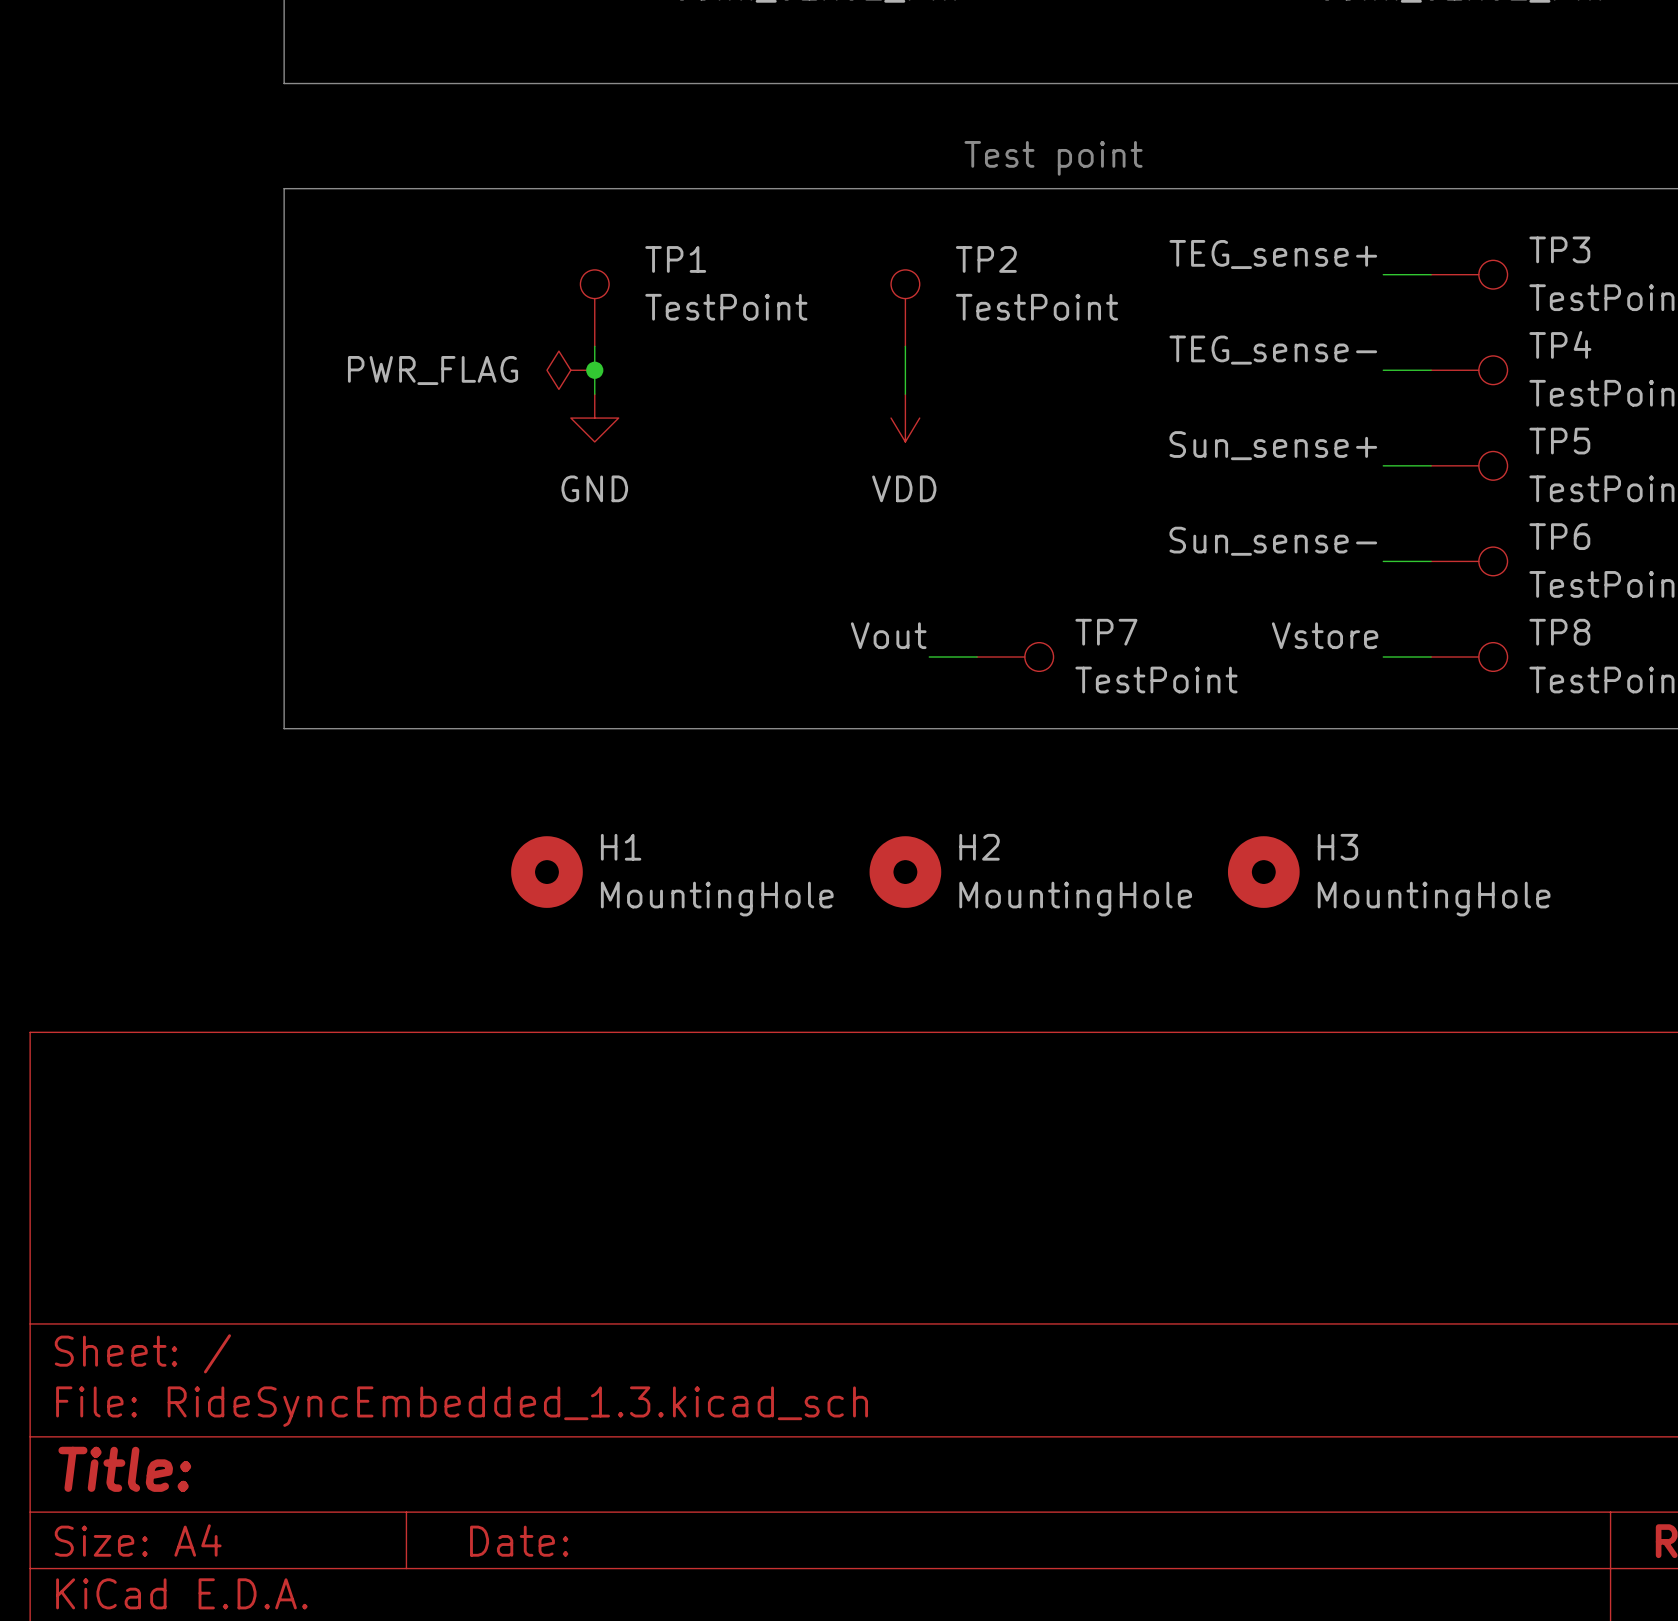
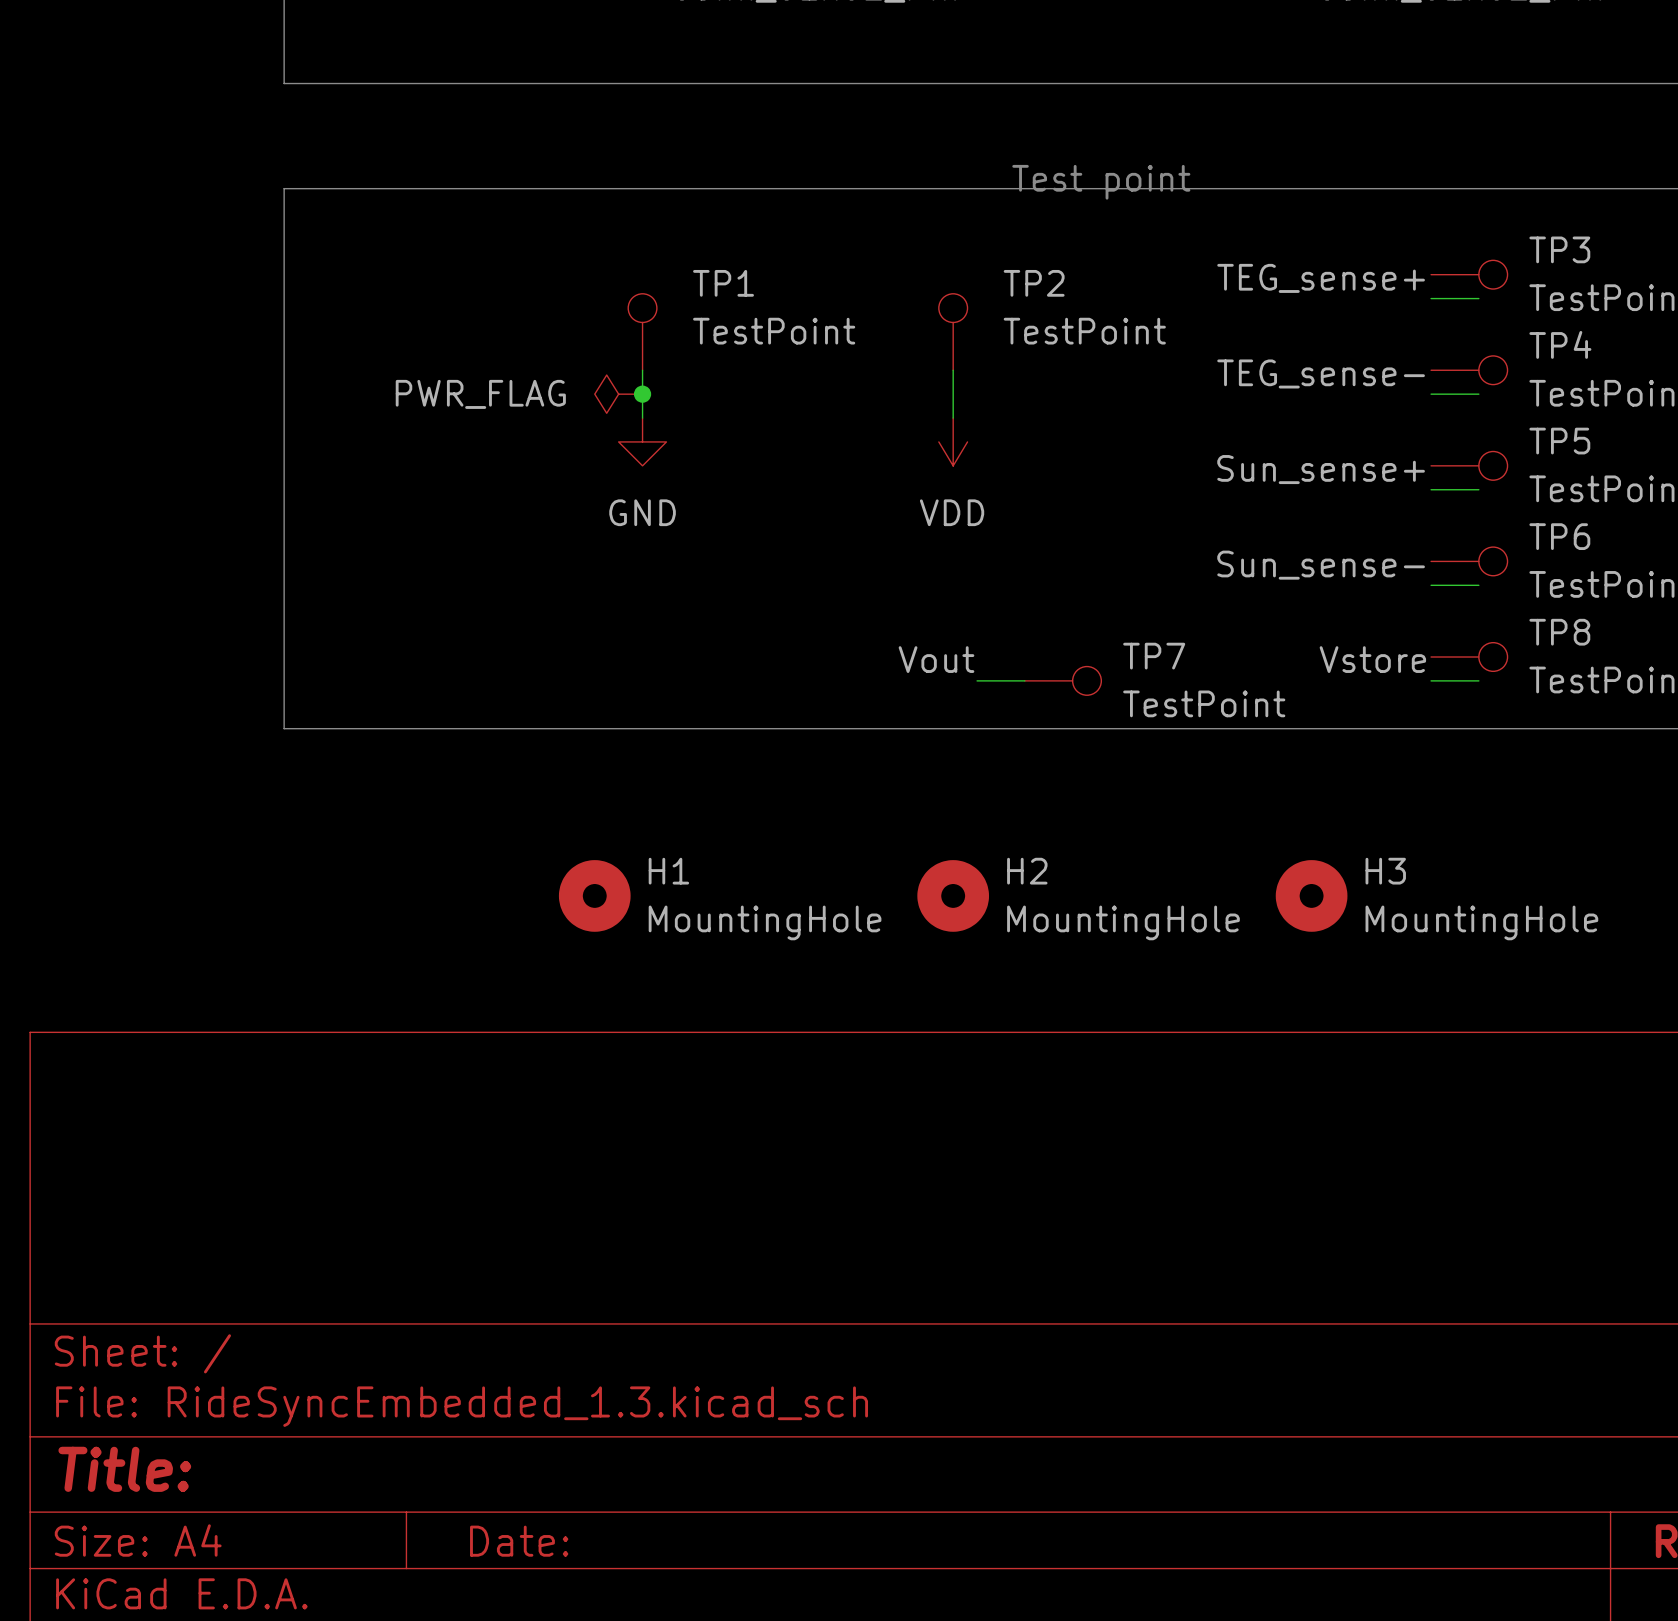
text position: Test point (1053, 158) -> Test point (1101, 182)
label position: TEG_sense+ (1273, 254) -> TEG_sense+ (1321, 278)
wire: (1383, 274) (1431, 274) -> (1431, 298) (1478, 298)
TP1 position: (594, 308) -> (642, 332)
TP2 position: (905, 308) -> (953, 332)
wire: (594, 346) (594, 394) -> (642, 370) (642, 418)
wire: (905, 346) (905, 394) -> (953, 370) (953, 418)
label position: TEG_sense- (1273, 350) -> TEG_sense- (1321, 373)
power symbol position: PWR_FLAG (570, 370) -> PWR_FLAG (618, 394)
junction position: (594, 370) -> (642, 394)
wire: (1383, 370) (1431, 370) -> (1431, 394) (1478, 394)
power symbol position: GND (594, 418) -> GND (642, 441)
power symbol position: VDD (905, 418) -> VDD (953, 441)
label position: Sun_sense+ (1273, 445) -> Sun_sense+ (1321, 469)
wire: (1383, 465) (1431, 465) -> (1431, 489) (1478, 489)
label position: Sun_sense- (1273, 541) -> Sun_sense- (1321, 565)
wire: (1383, 561) (1431, 561) -> (1431, 585) (1478, 585)
label position: Vout (888, 635) -> Vout (936, 659)
label position: Vstore (1325, 635) -> Vstore (1372, 659)
wire: (929, 657) (977, 657) -> (977, 680) (1024, 680)
TP7 position: (1015, 657) -> (1063, 680)
wire: (1383, 657) (1431, 657) -> (1431, 680) (1478, 680)
H1 position: (546, 872) -> (594, 895)
H2 position: (905, 872) -> (953, 895)
H3 position: (1263, 872) -> (1311, 895)

